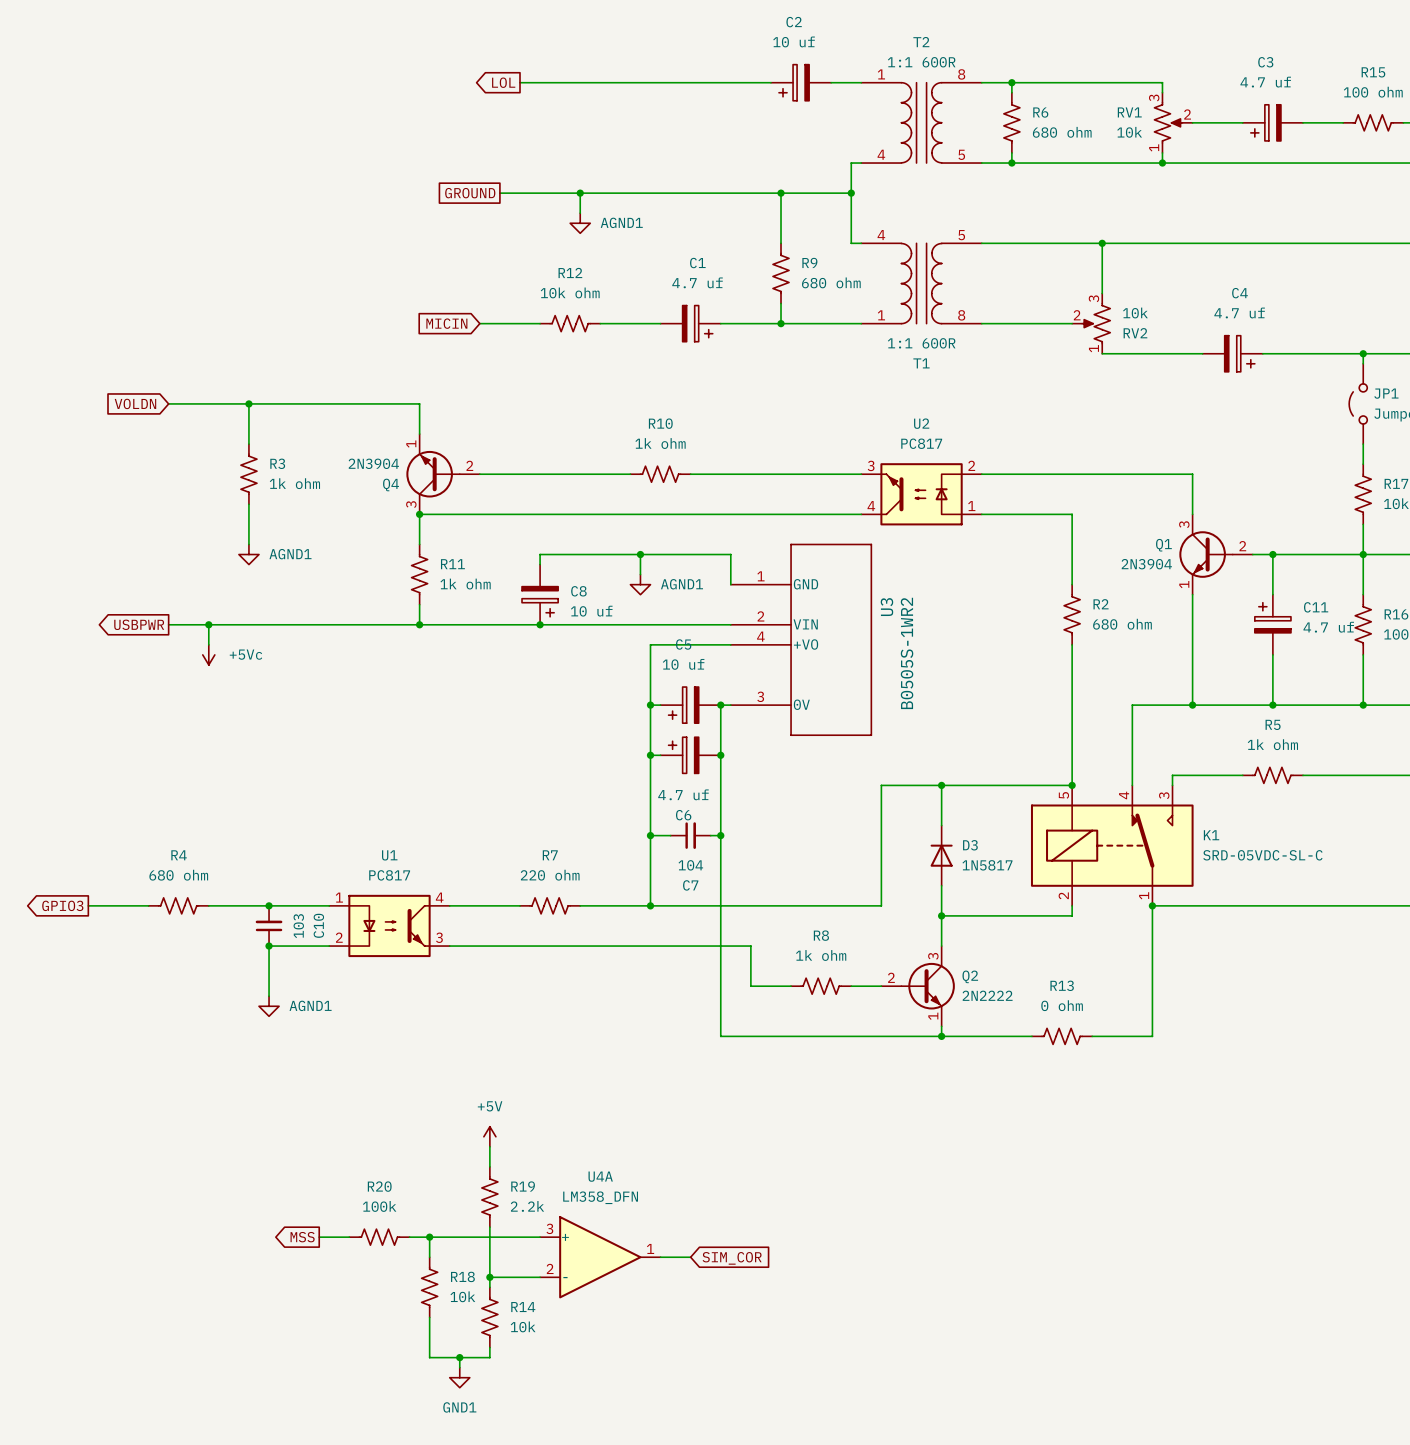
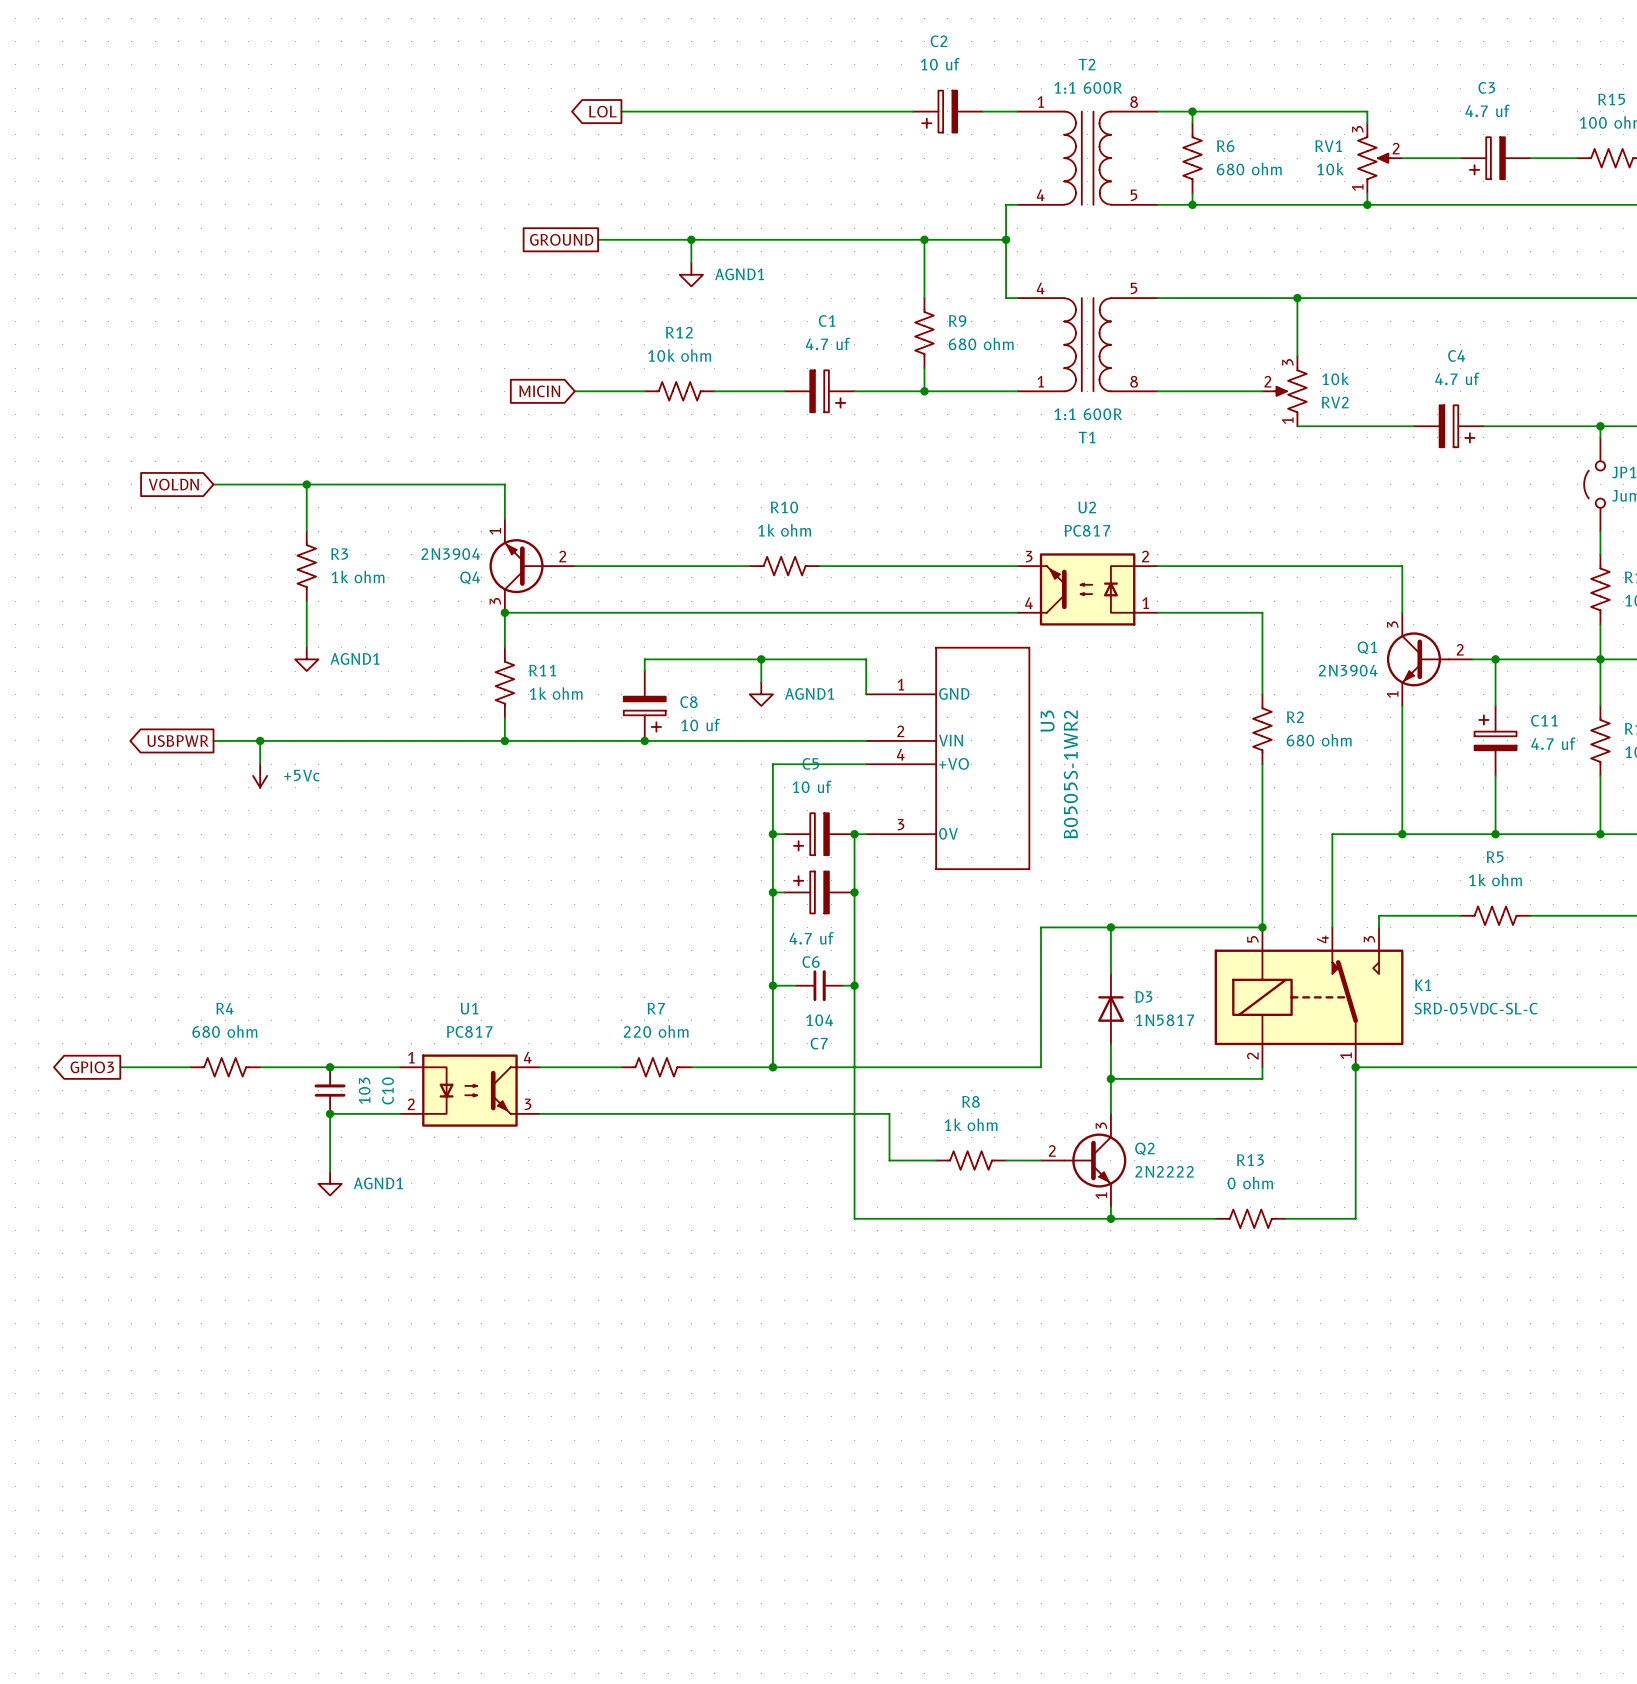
power symbol: +5V (489, 1136) -> none
wire: (489, 1146) (489, 1166) -> none
R19: 2.2k (489, 1197) -> none
wire: (489, 1227) (489, 1287) -> none
global label: MSS (302, 1237) -> none
wire: (319, 1237) (349, 1237) -> none
R20: 100k (379, 1237) -> none
wire: (409, 1237) (540, 1237) -> none
wire: (429, 1237) (429, 1257) -> none
junction: (429, 1237) -> none
U4A: LM358_DFN (600, 1257) -> none
wire: (660, 1257) (690, 1257) -> none
global label: SIM_COR (732, 1258) -> none
wire: (489, 1277) (540, 1277) -> none
junction: (489, 1277) -> none
R18: 10k (429, 1287) -> none
wire: (429, 1317) (429, 1357) (489, 1357) (489, 1347) -> none
R14: 10k (489, 1317) -> none
wire: (459, 1357) (459, 1367) -> none
junction: (459, 1357) -> none
power symbol: GND1 (459, 1377) -> none

